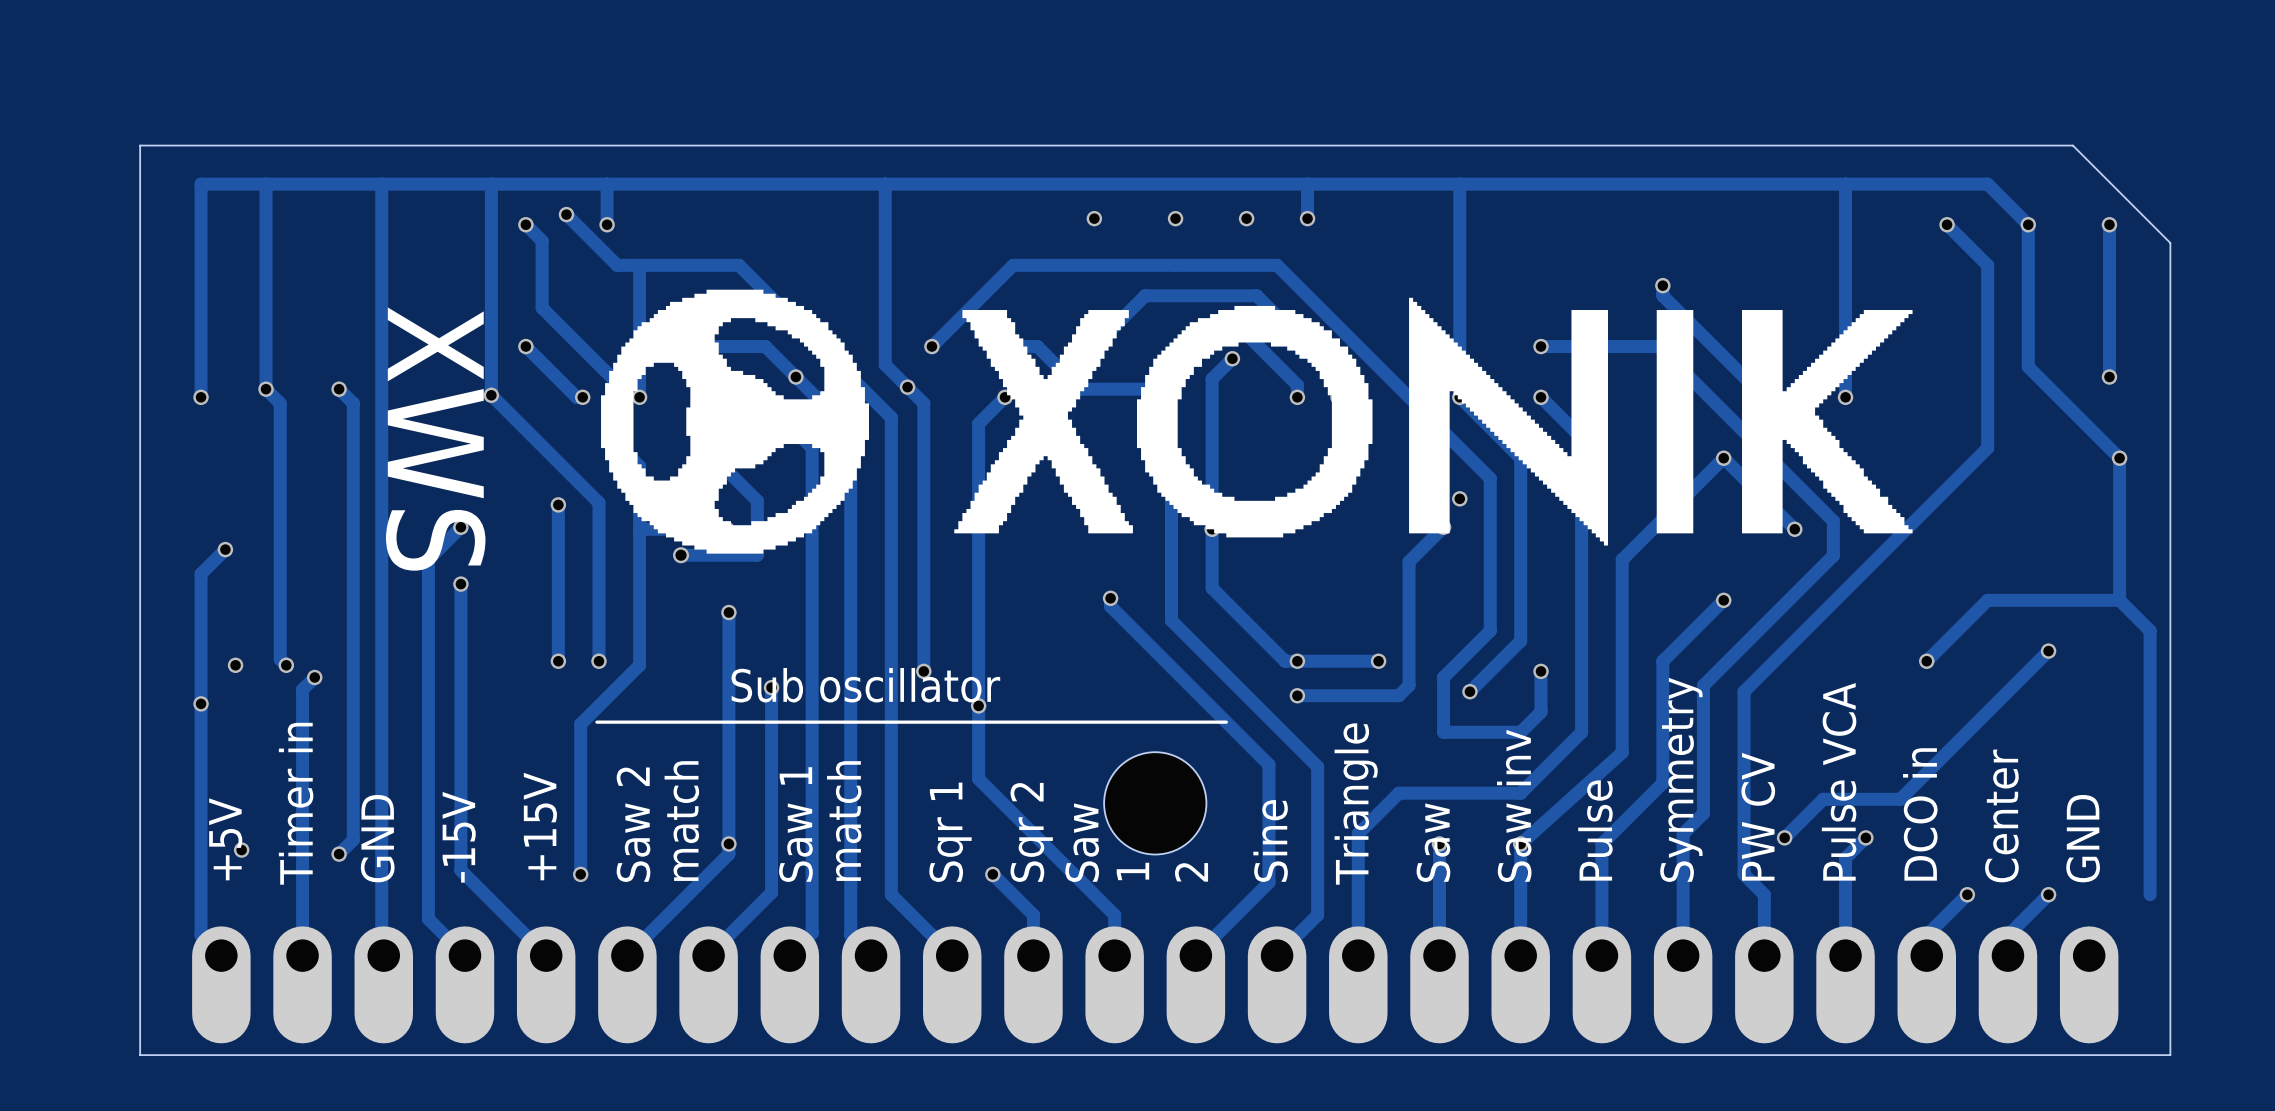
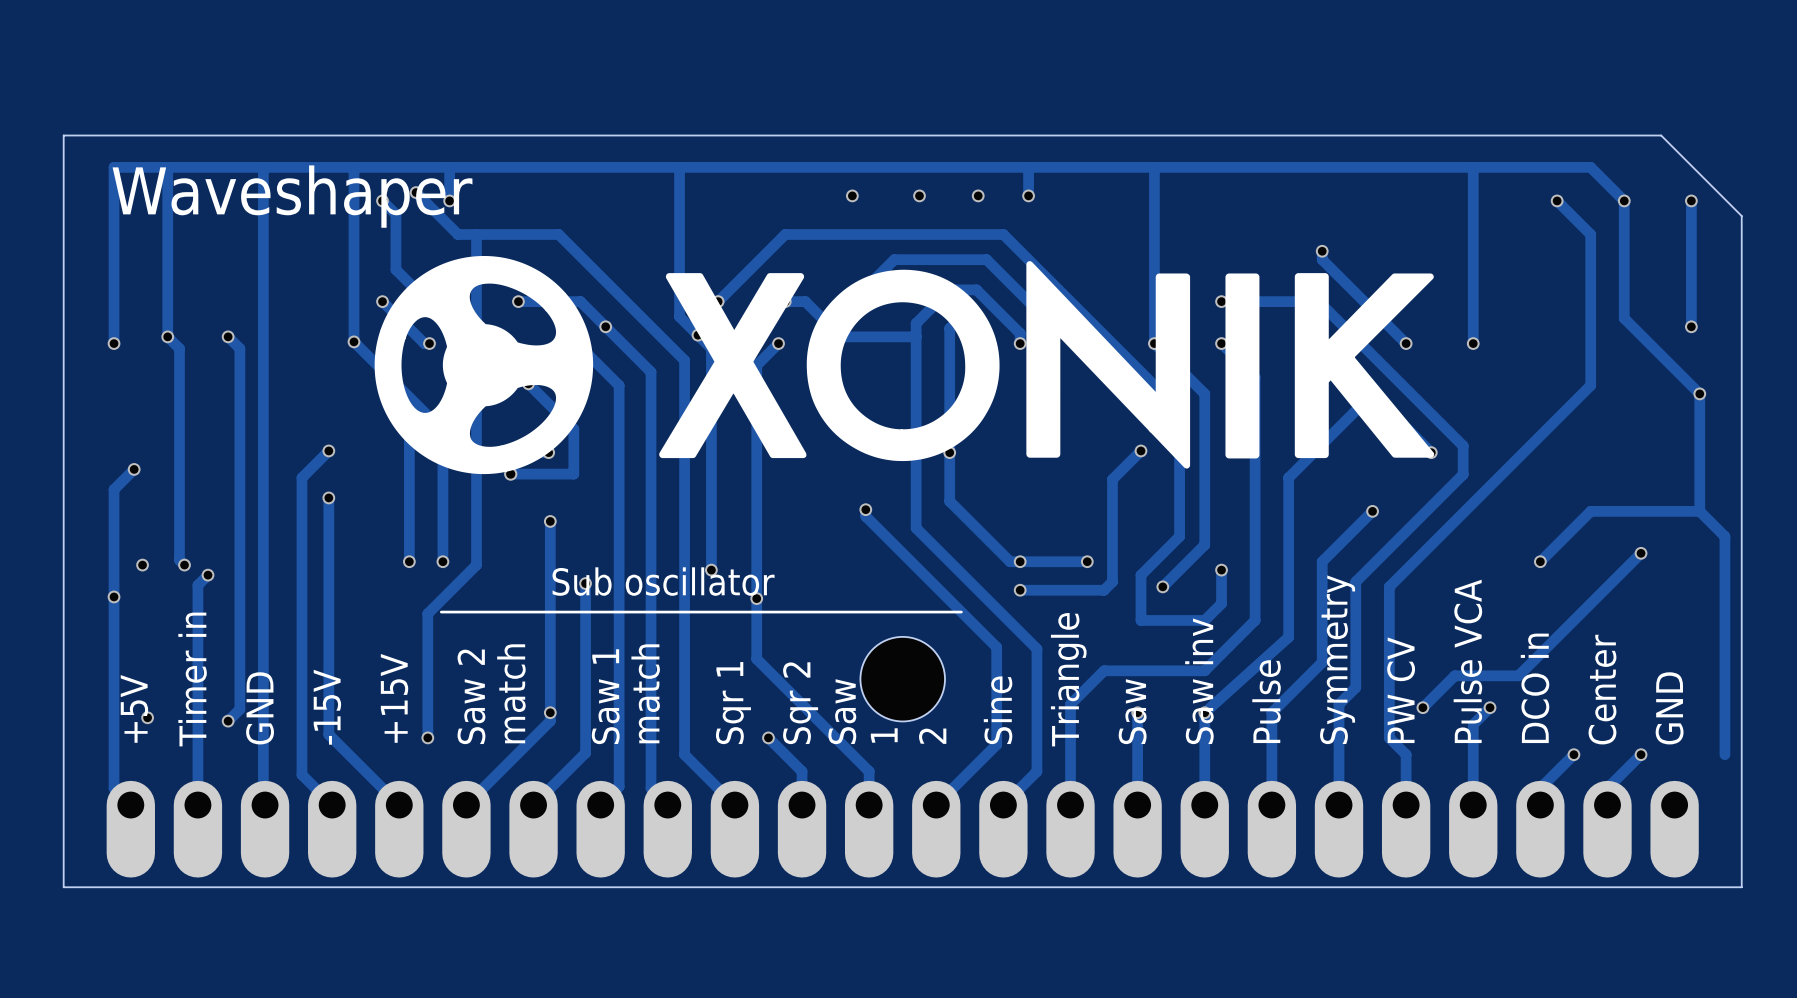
text: none -> Waveshaper (292, 196)
drawing: [601, 289, 870, 554] -> none
drawing: none -> [374, 255, 594, 475]
drawing: none -> [659, 261, 1191, 469]
drawing: [954, 297, 1609, 546] -> none
drawing: [1656, 310, 1694, 534] -> none
drawing: [1742, 310, 1913, 534] -> none
drawing: none -> [1225, 273, 1260, 459]
drawing: none -> [1294, 273, 1435, 459]
text: XWS (435, 439) -> none

